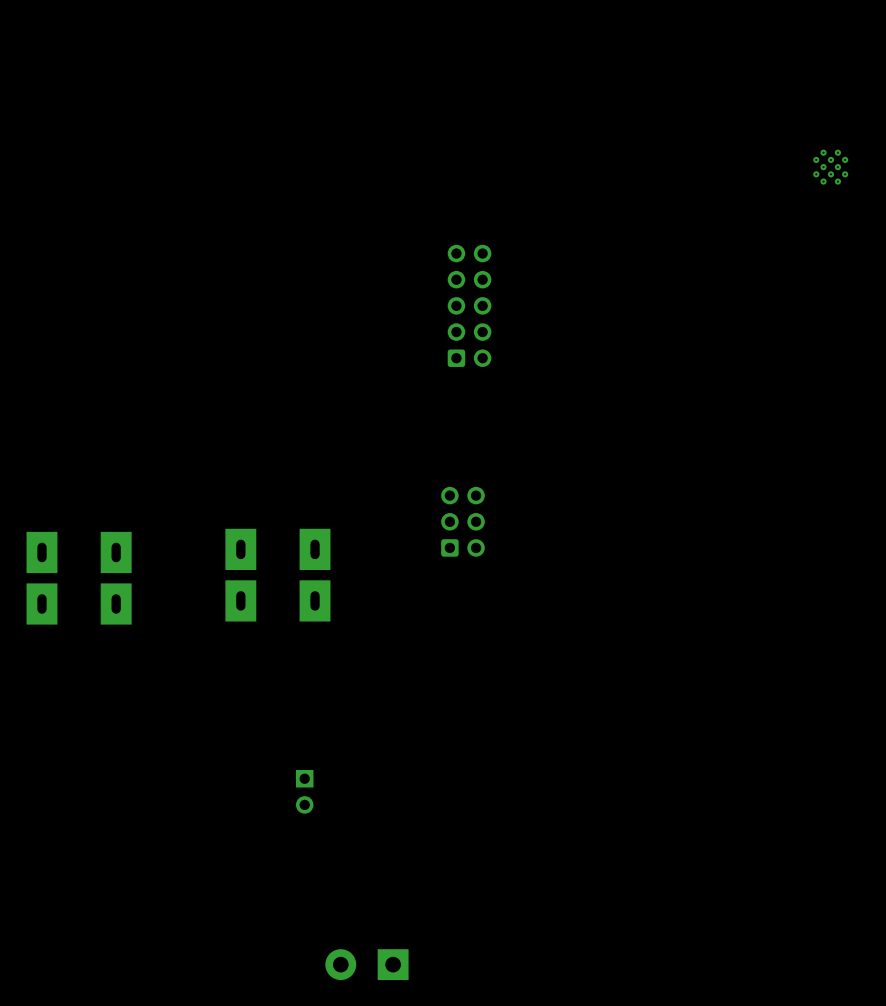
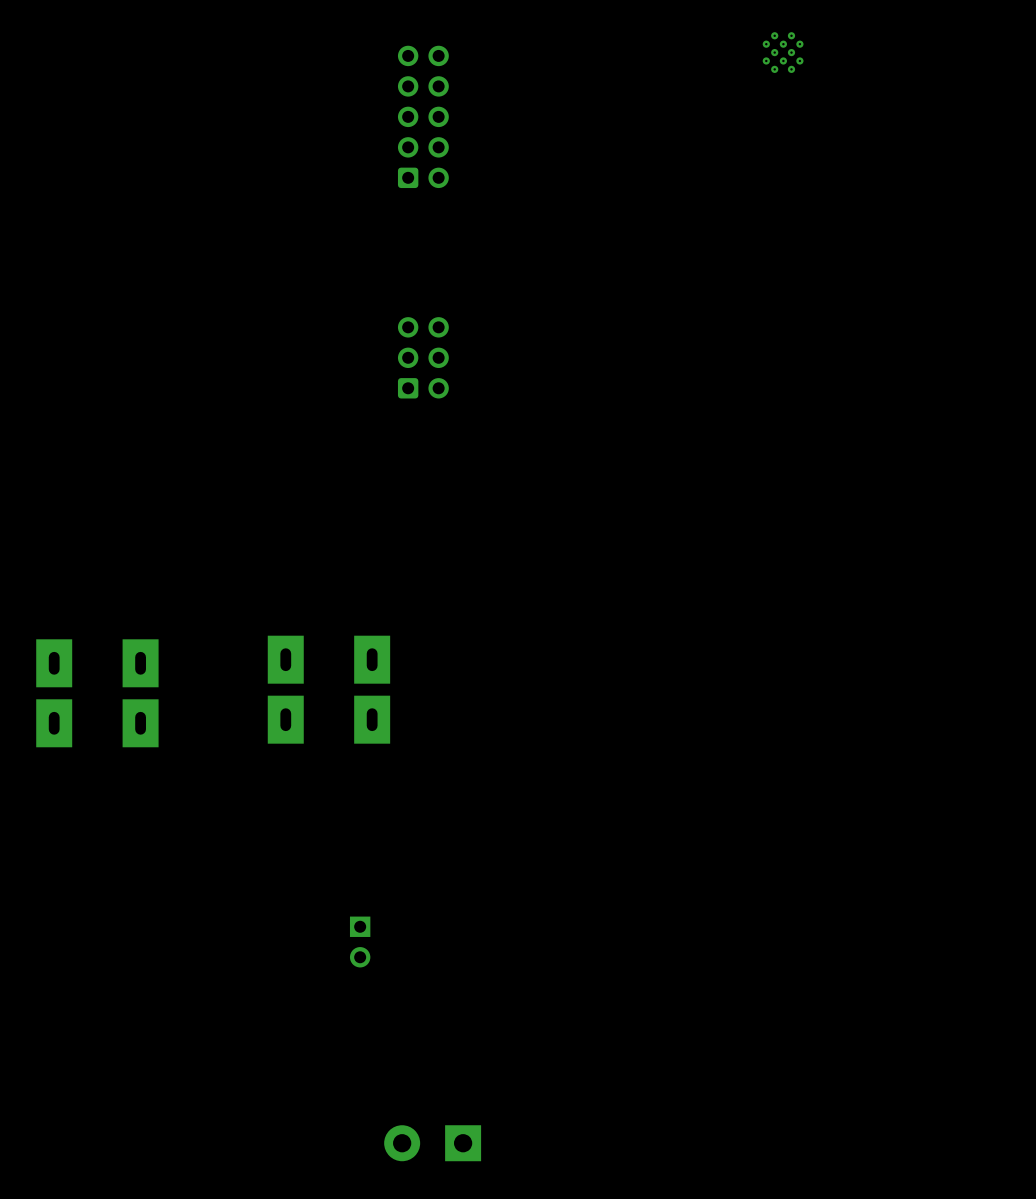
part position: (830, 167) -> (783, 52)
part position: (469, 305) -> (423, 116)
part position: (462, 521) -> (423, 357)

